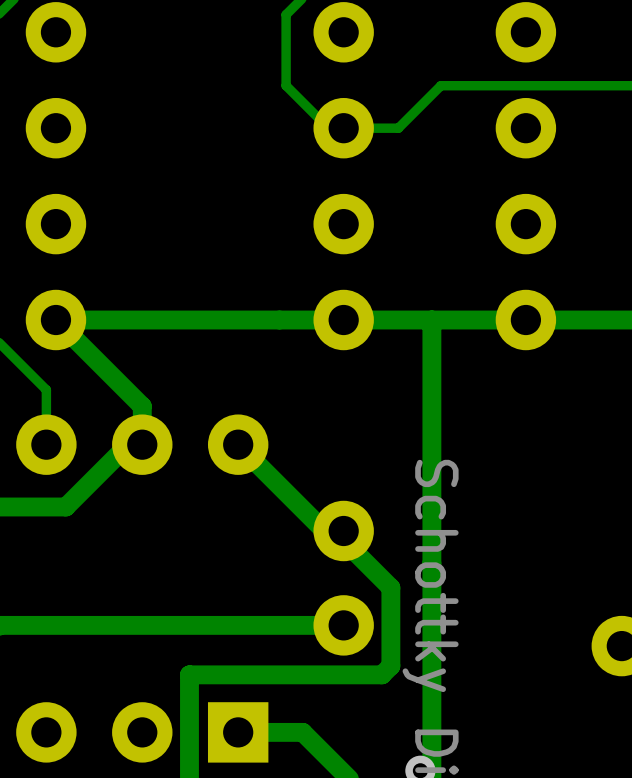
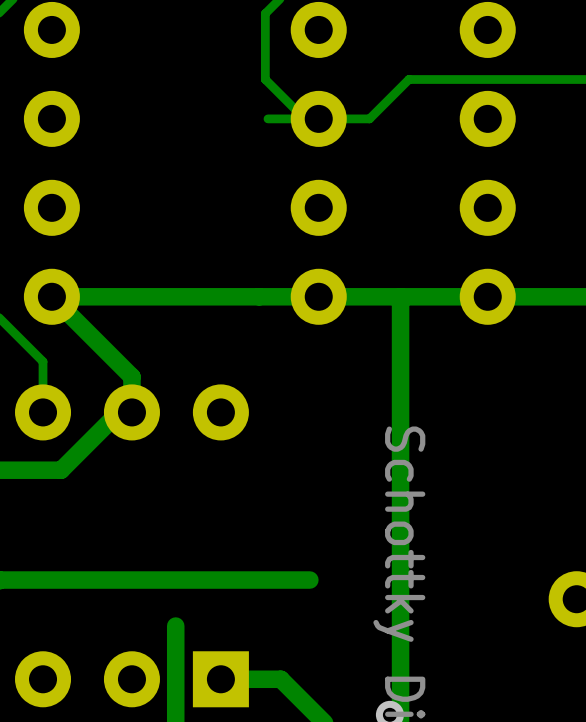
track: none -> (304, 118) (267, 118)
track: (238, 444) (324, 530) (334, 530) (390, 587) (390, 666) (382, 674) (189, 674) -> none
part: (343, 578) -> none

